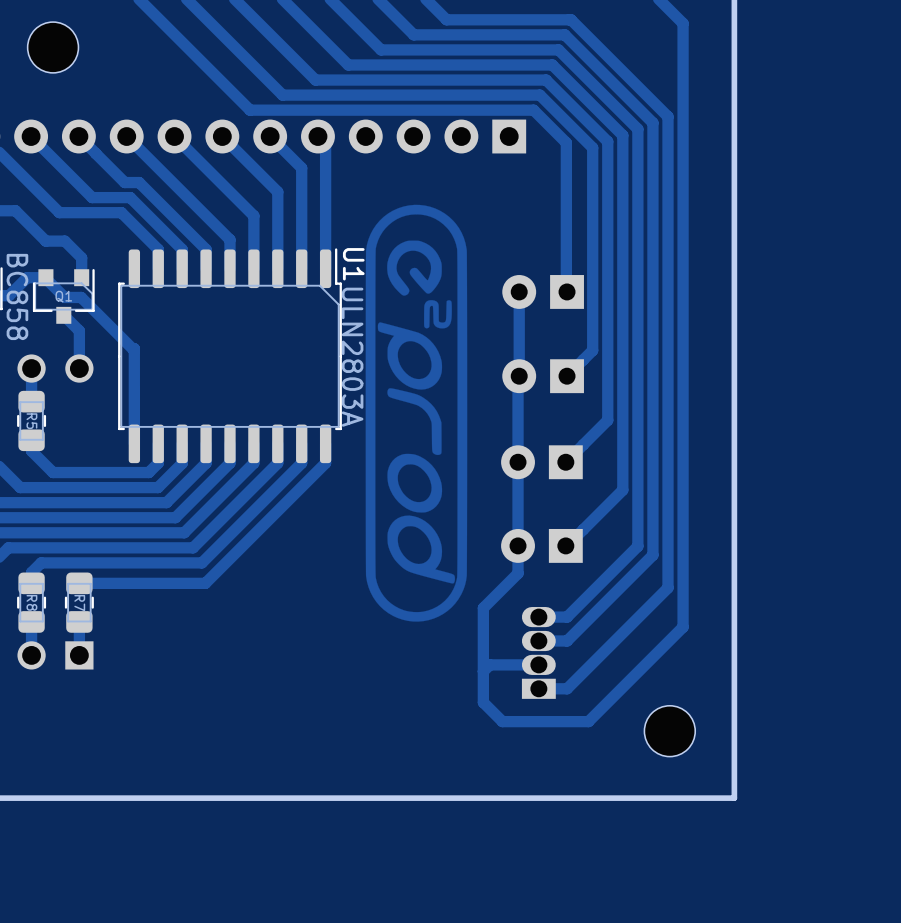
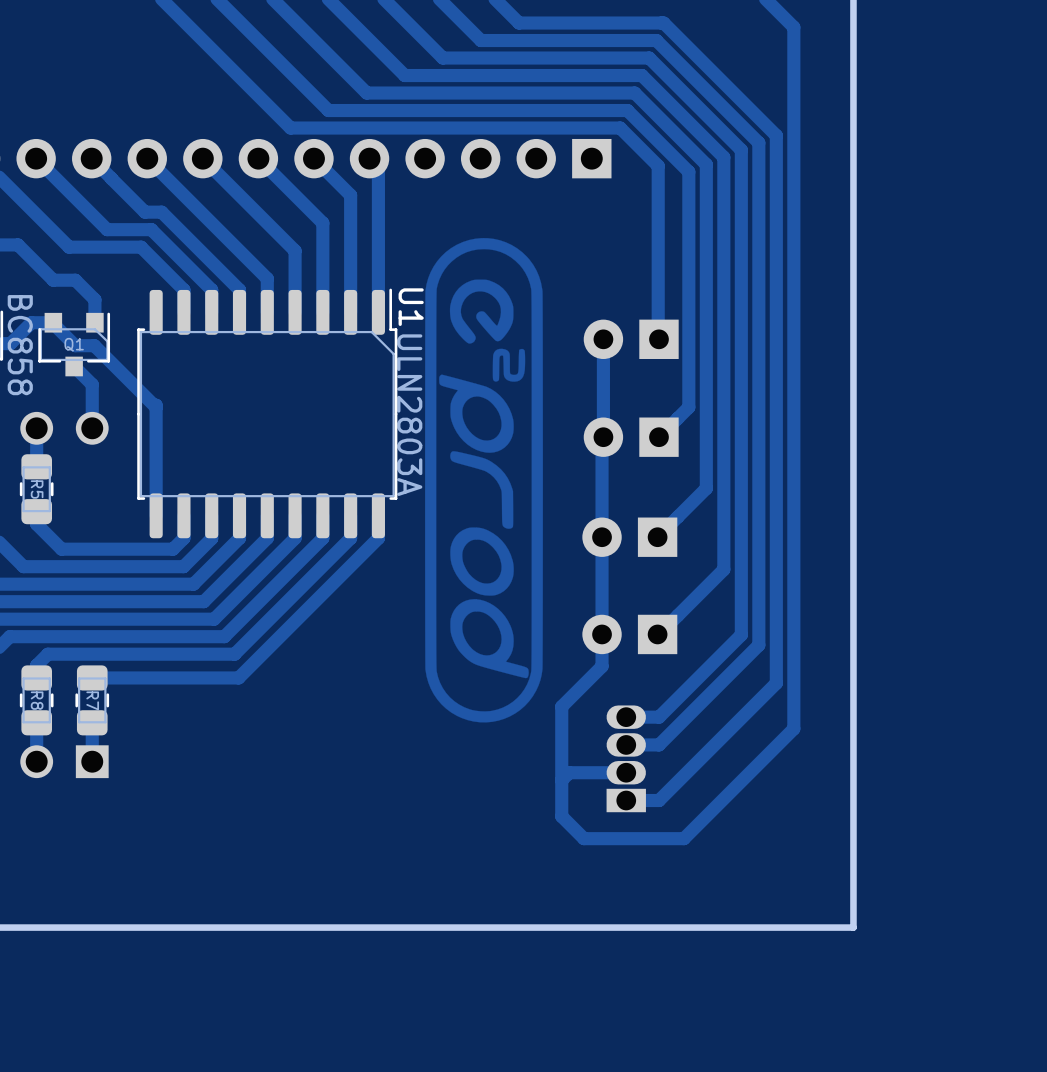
part: (53, 47) -> none
part: (669, 731) -> none

